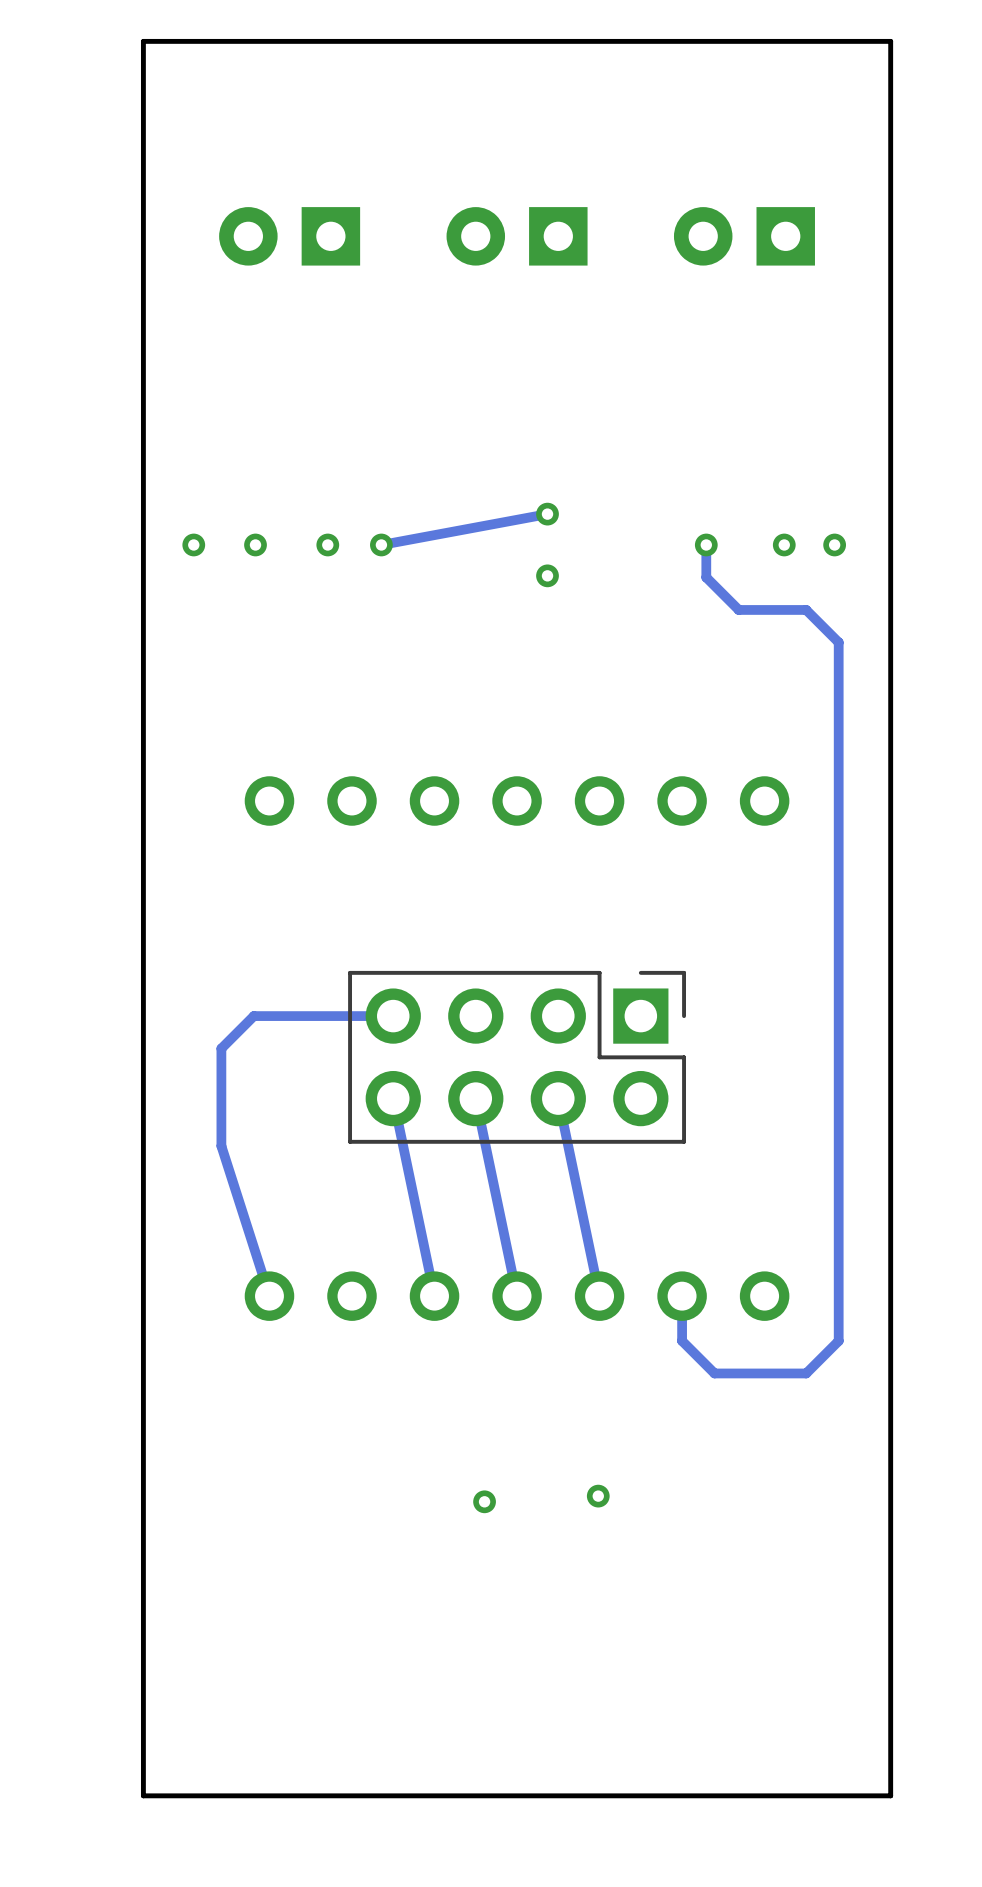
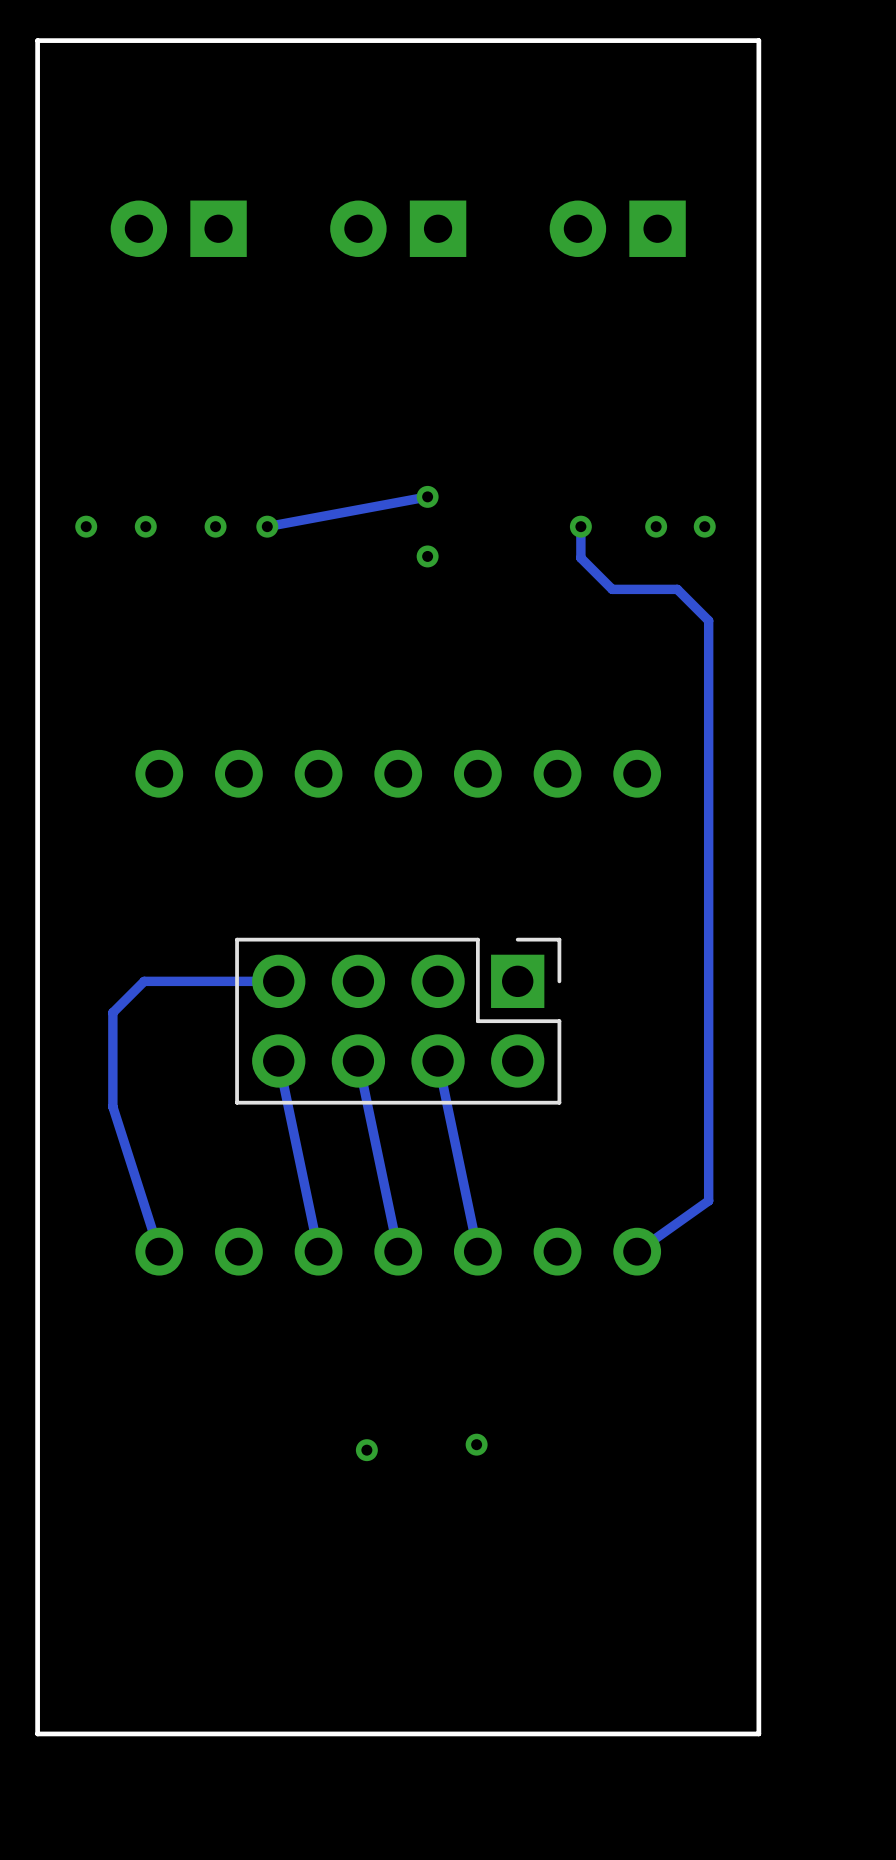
track: (838, 1243) (838, 1340) (806, 1373) (714, 1373) (682, 1340) (682, 1296) -> (708, 1200) (637, 1251)

